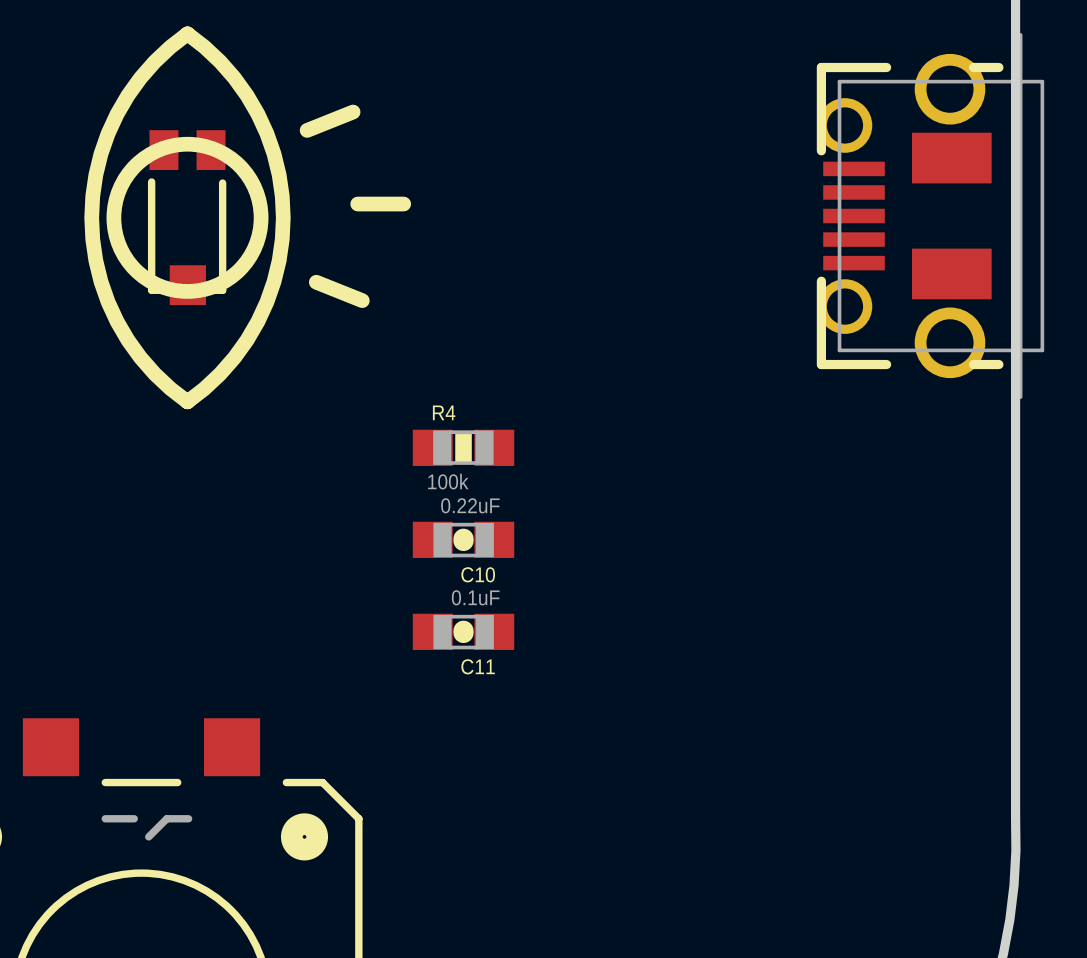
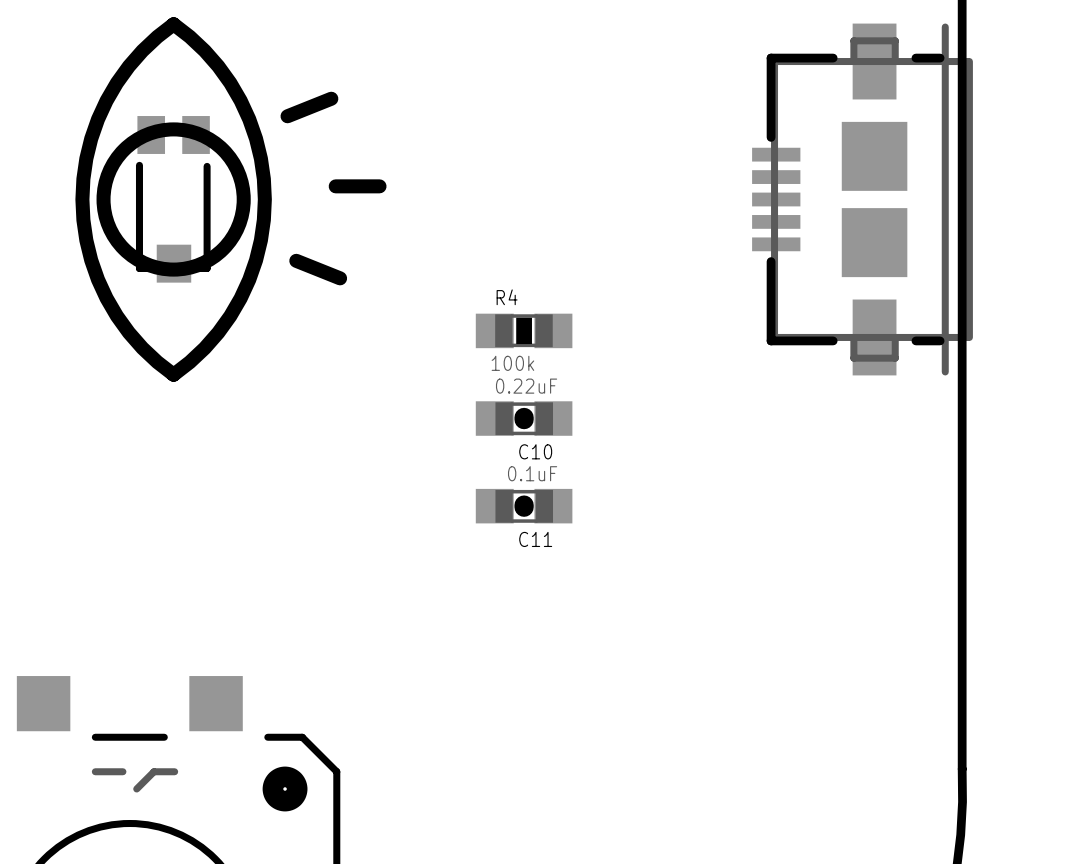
part footprint: [816, 33, 1045, 399] -> [752, 23, 973, 376]
R4 position: (463, 447) -> (524, 330)
C10 position: (463, 539) -> (524, 418)
C11 position: (463, 631) -> (524, 506)

